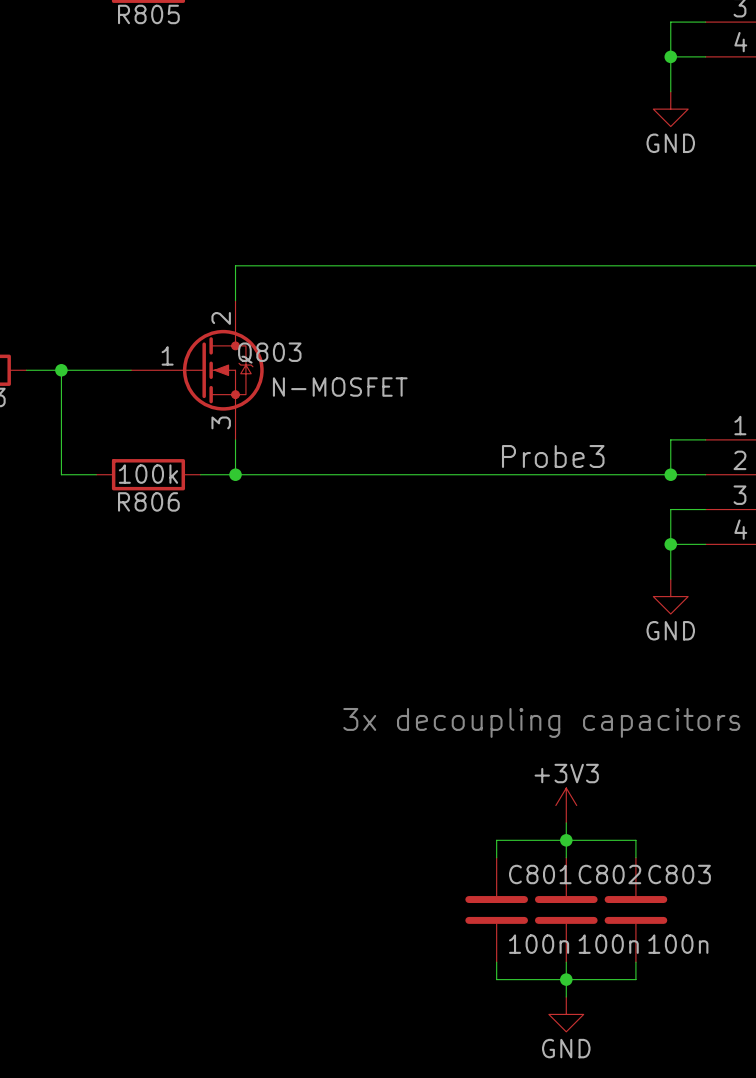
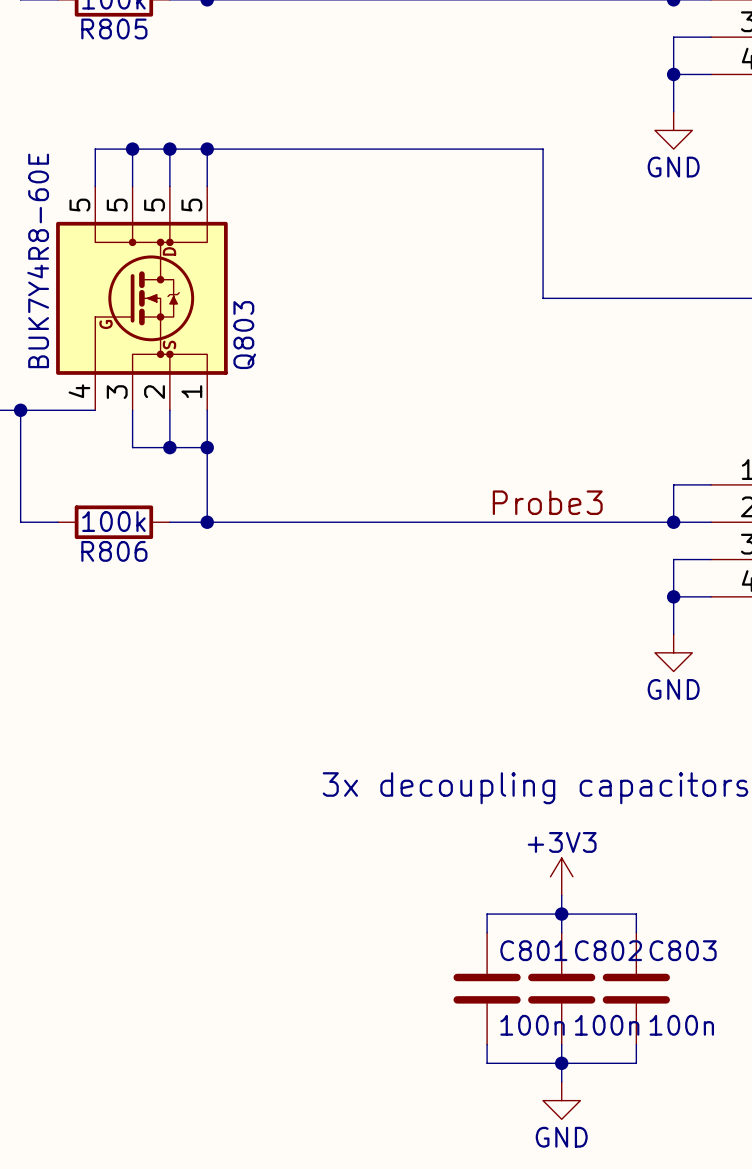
wire: none -> (132, 149) (132, 186)
junction: none -> (132, 149)
wire: none -> (169, 149) (169, 186)
junction: none -> (169, 149)
wire: none -> (207, 149) (207, 186)
junction: none -> (207, 149)
wire: (548, 265) (235, 265) (235, 300) -> (543, 298) (543, 149) (95, 149) (95, 186)
Q803 symbol: [131, 300, 264, 440] -> [56, 186, 228, 411]
Q803 name position: Q803 (269, 353) -> Q803 (244, 335)
wire: none -> (132, 410) (132, 447) (207, 447)
wire: none -> (169, 410) (169, 447)
Q803 value: N-MOSFET (340, 387) -> BUK7Y4R8-60E (38, 260)
junction: none -> (169, 447)
junction: none -> (207, 447)

